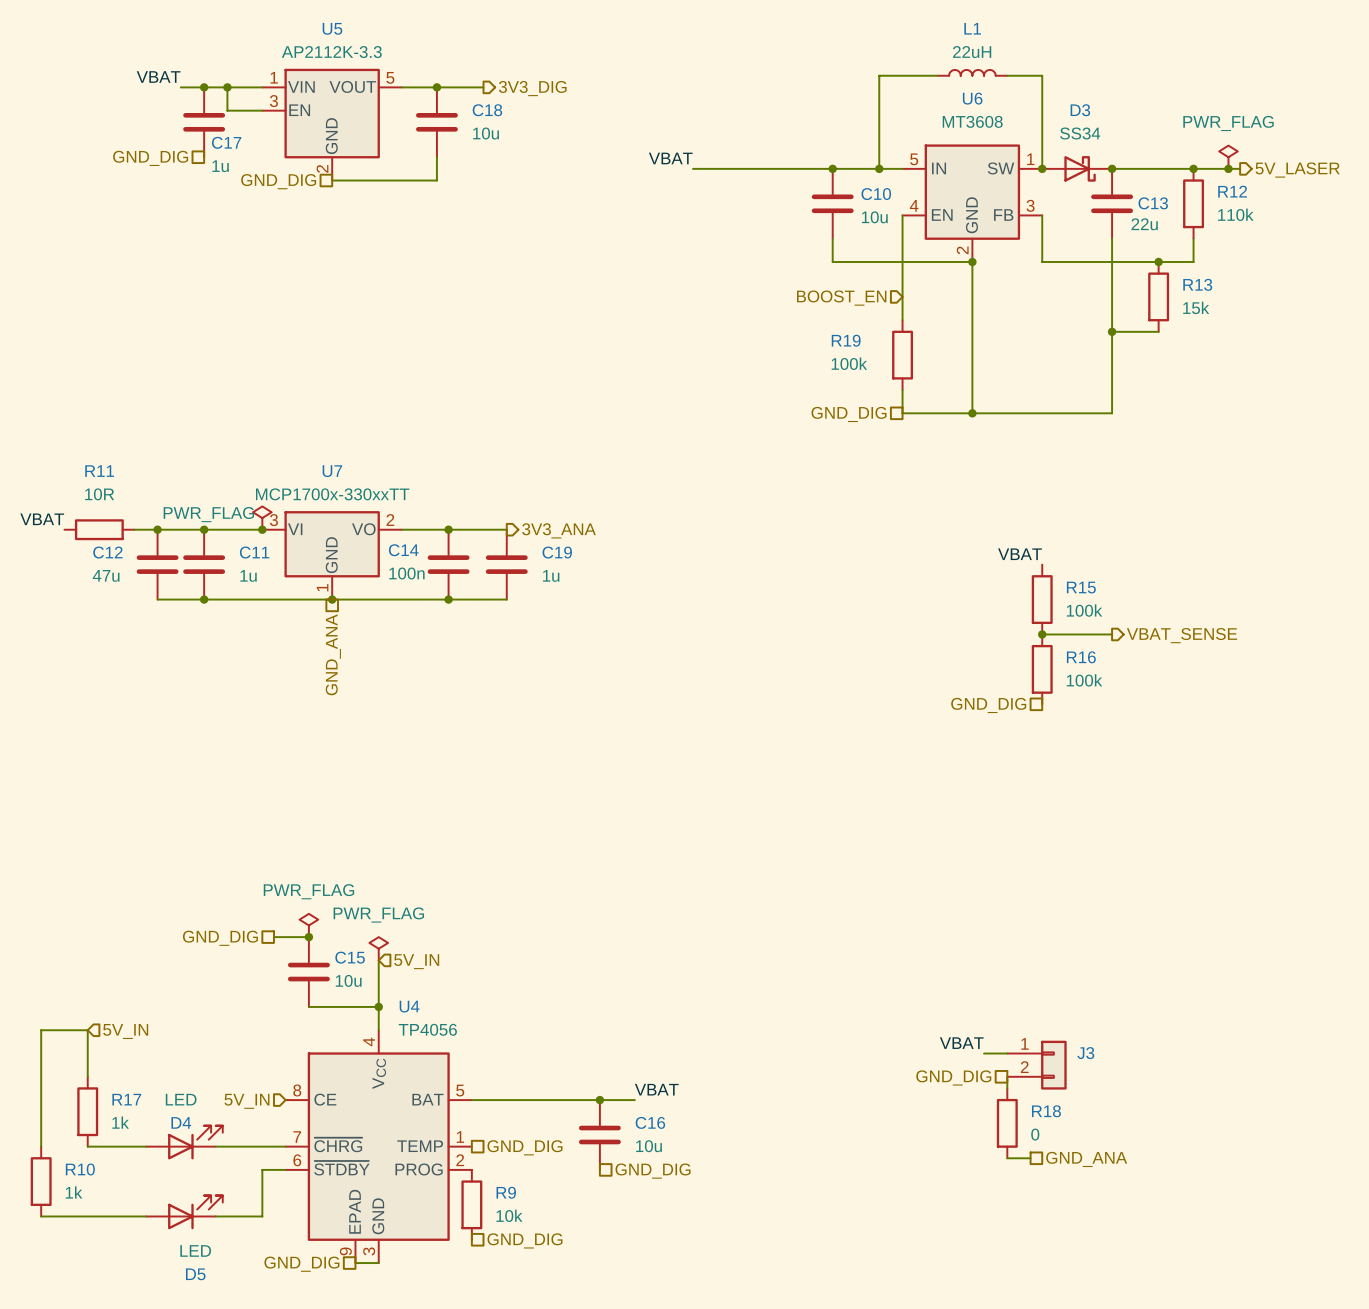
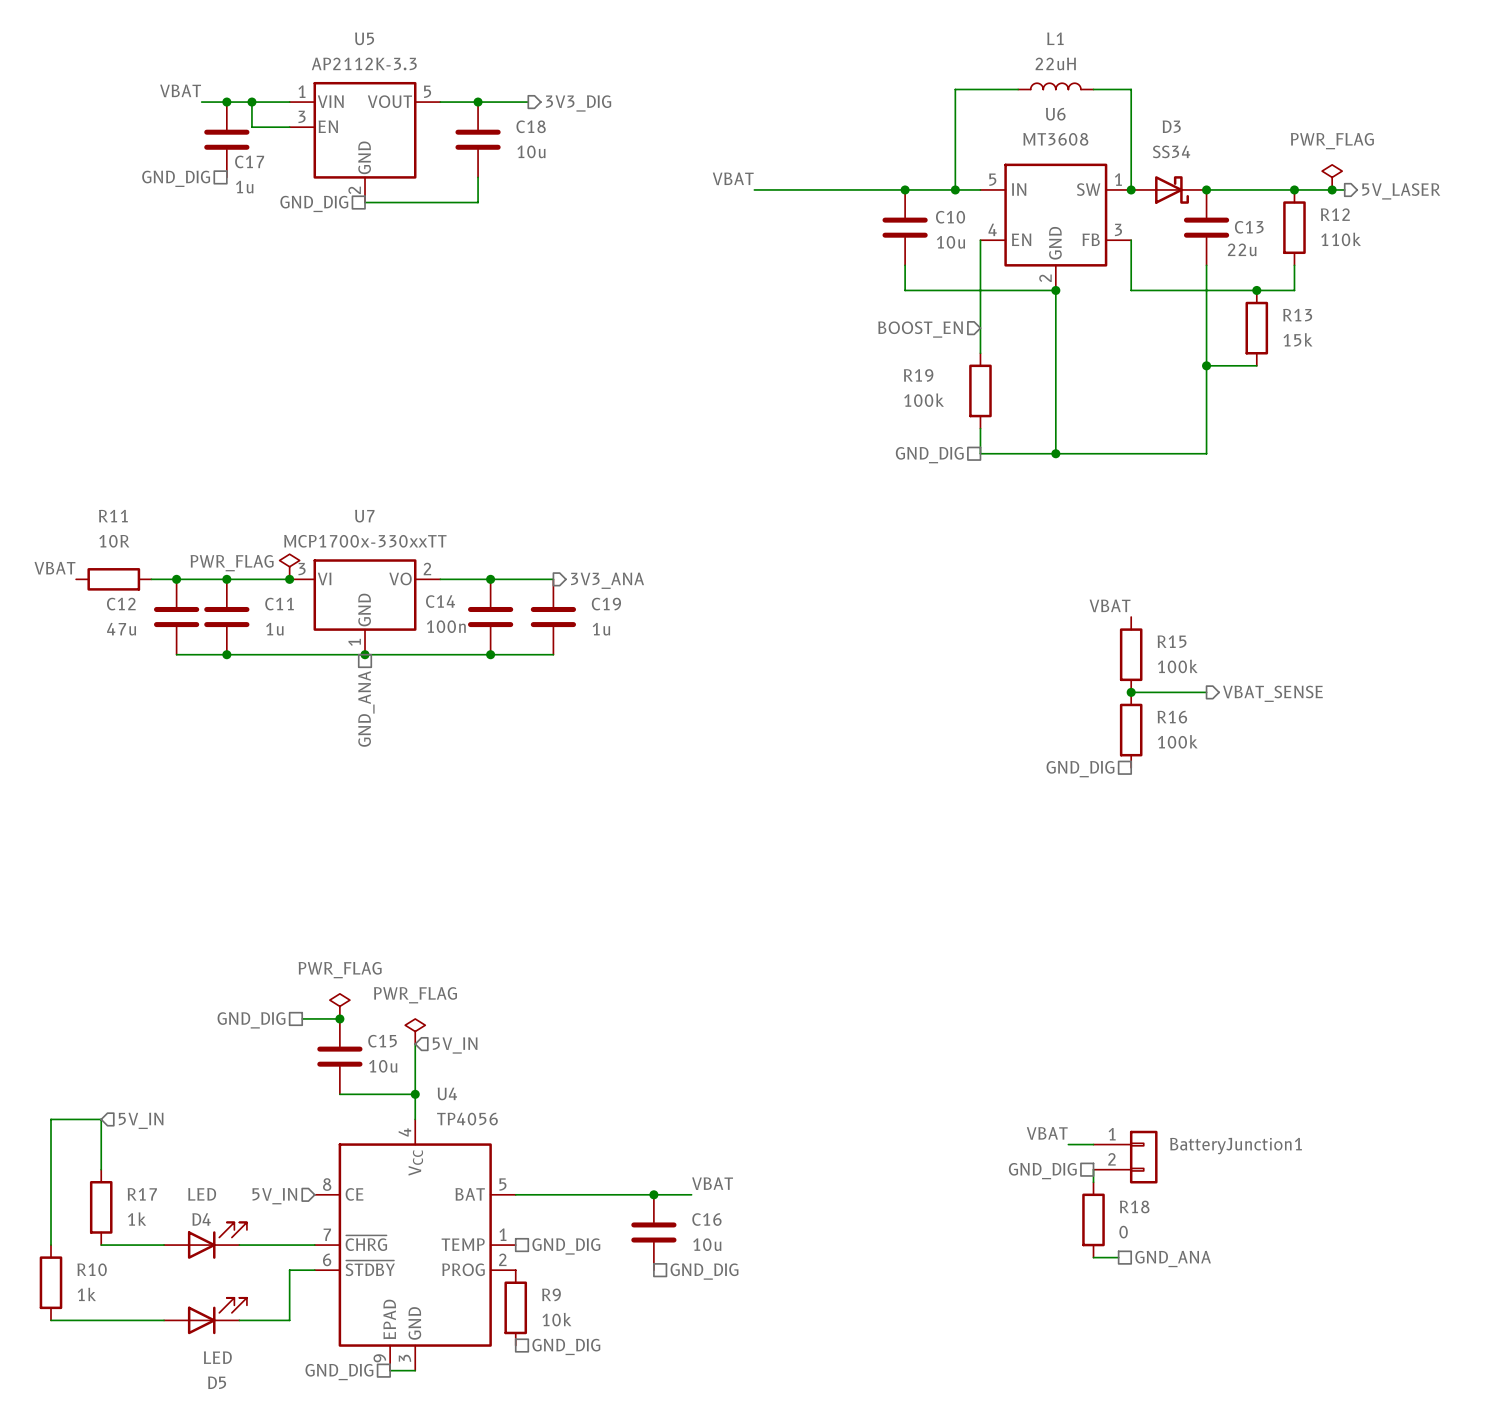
J3 name: J3 (1085, 1053) -> BatteryJunction1 (1236, 1146)

